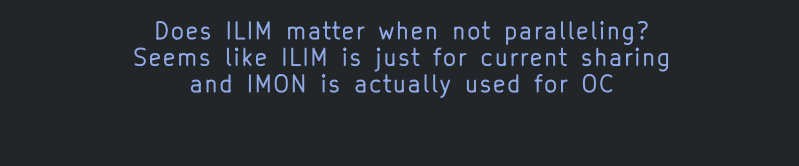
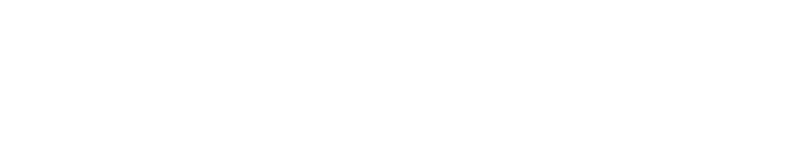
text: Does ILIM matter when not paralleling? (402, 33) -> none
text: Seems like ILIM is just for current sharing (401, 59) -> none
text: and IMON is actually used for OC (401, 86) -> none

